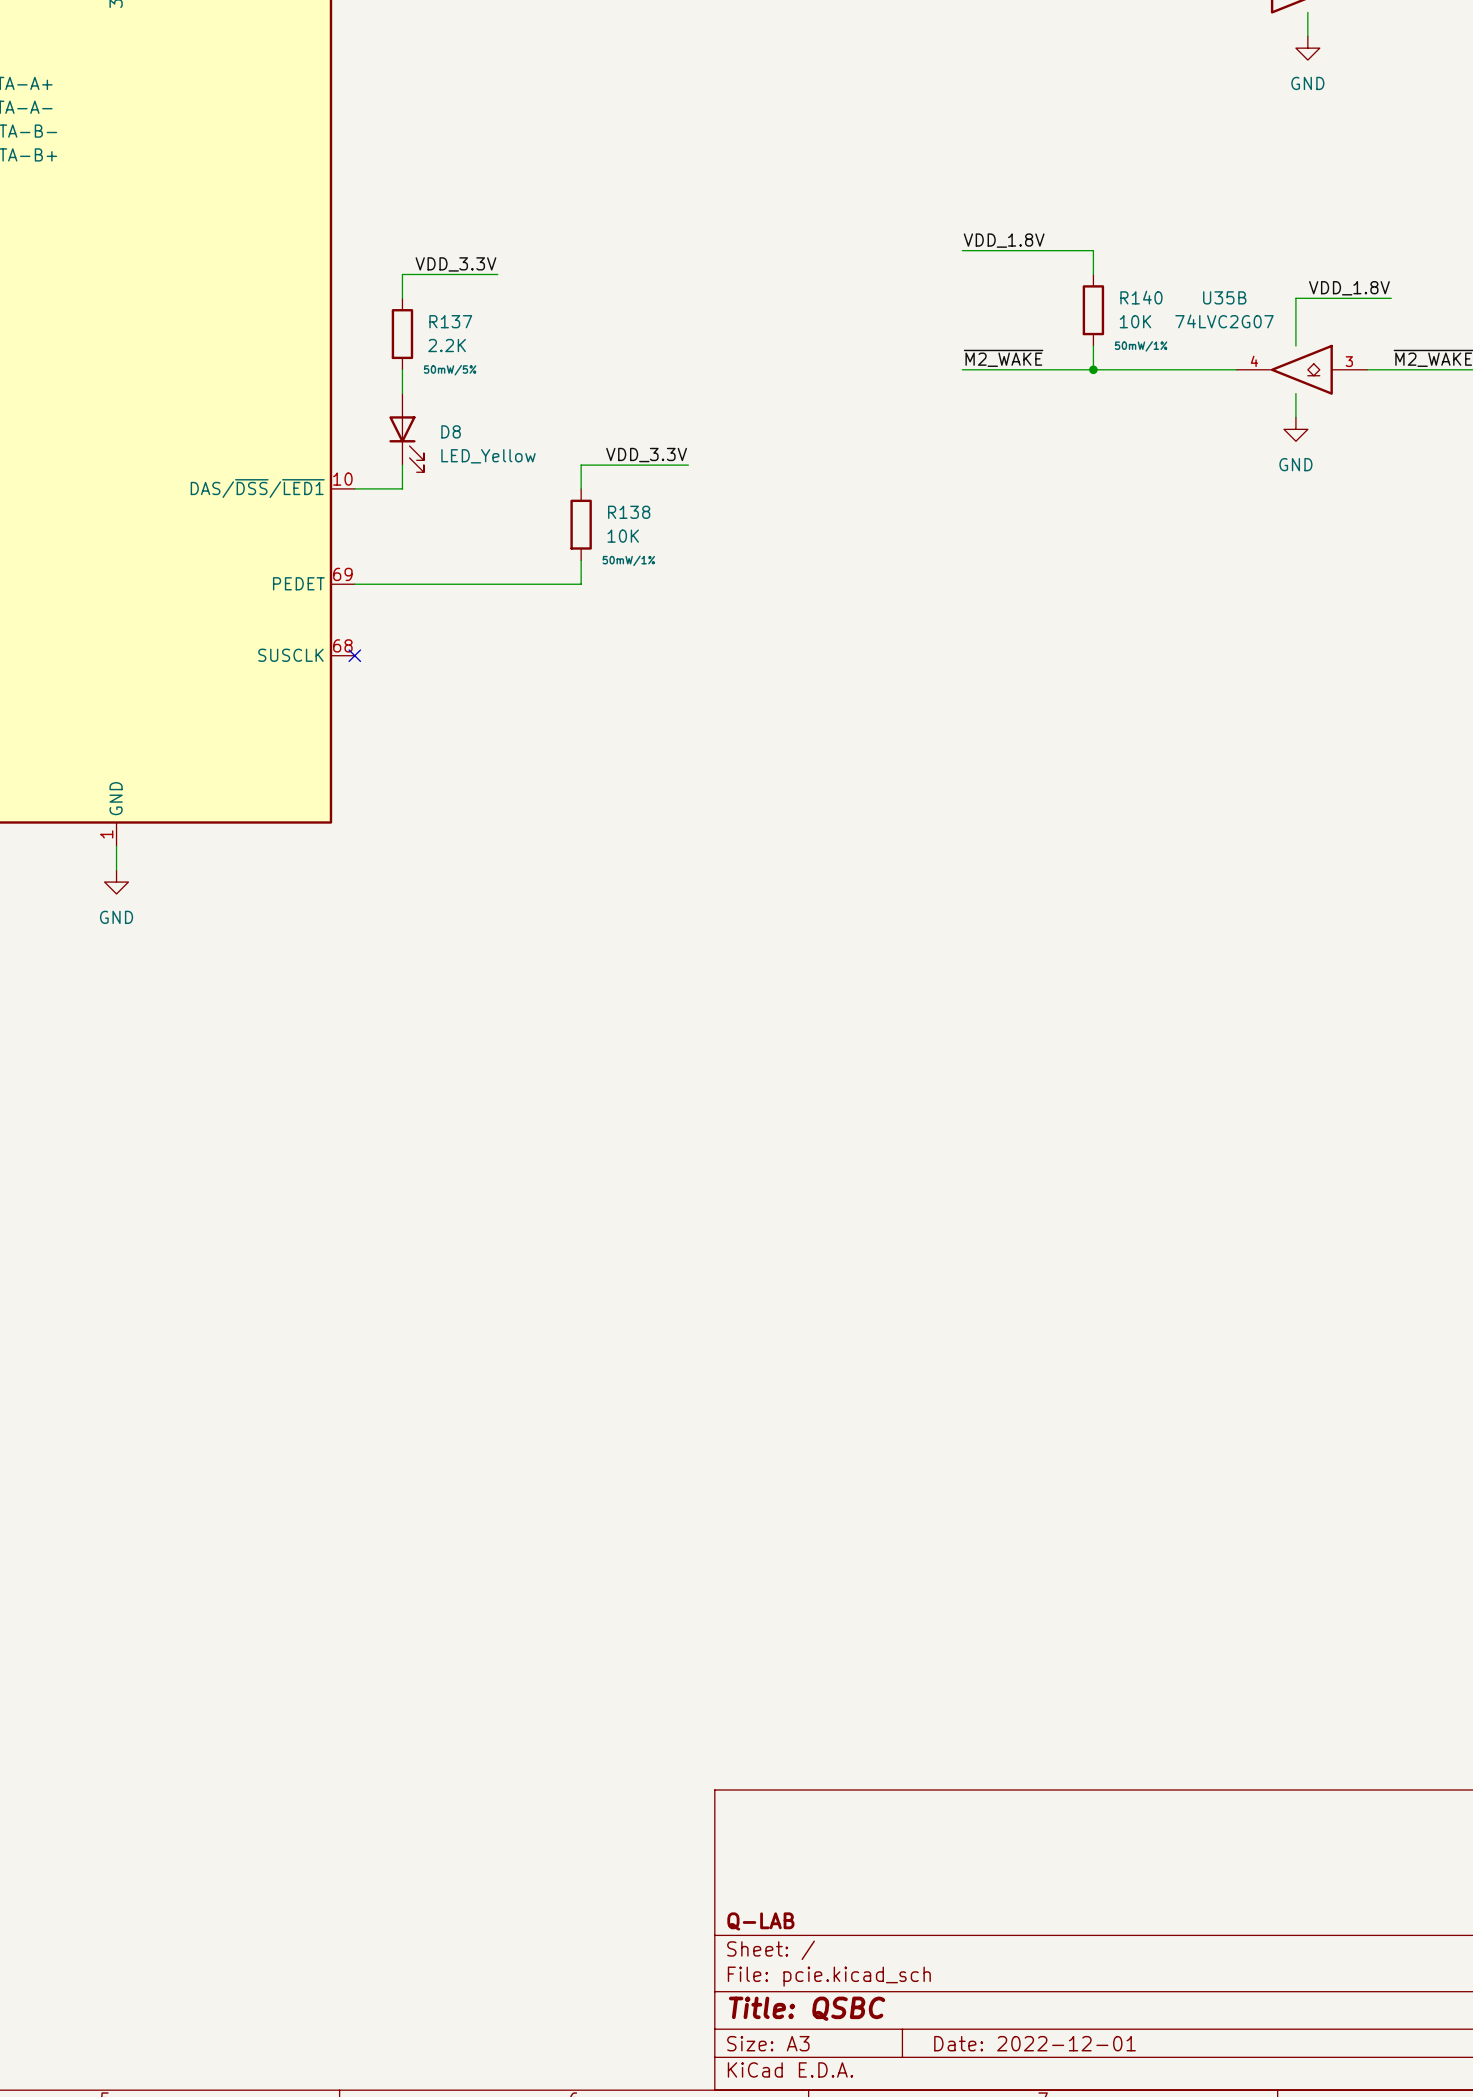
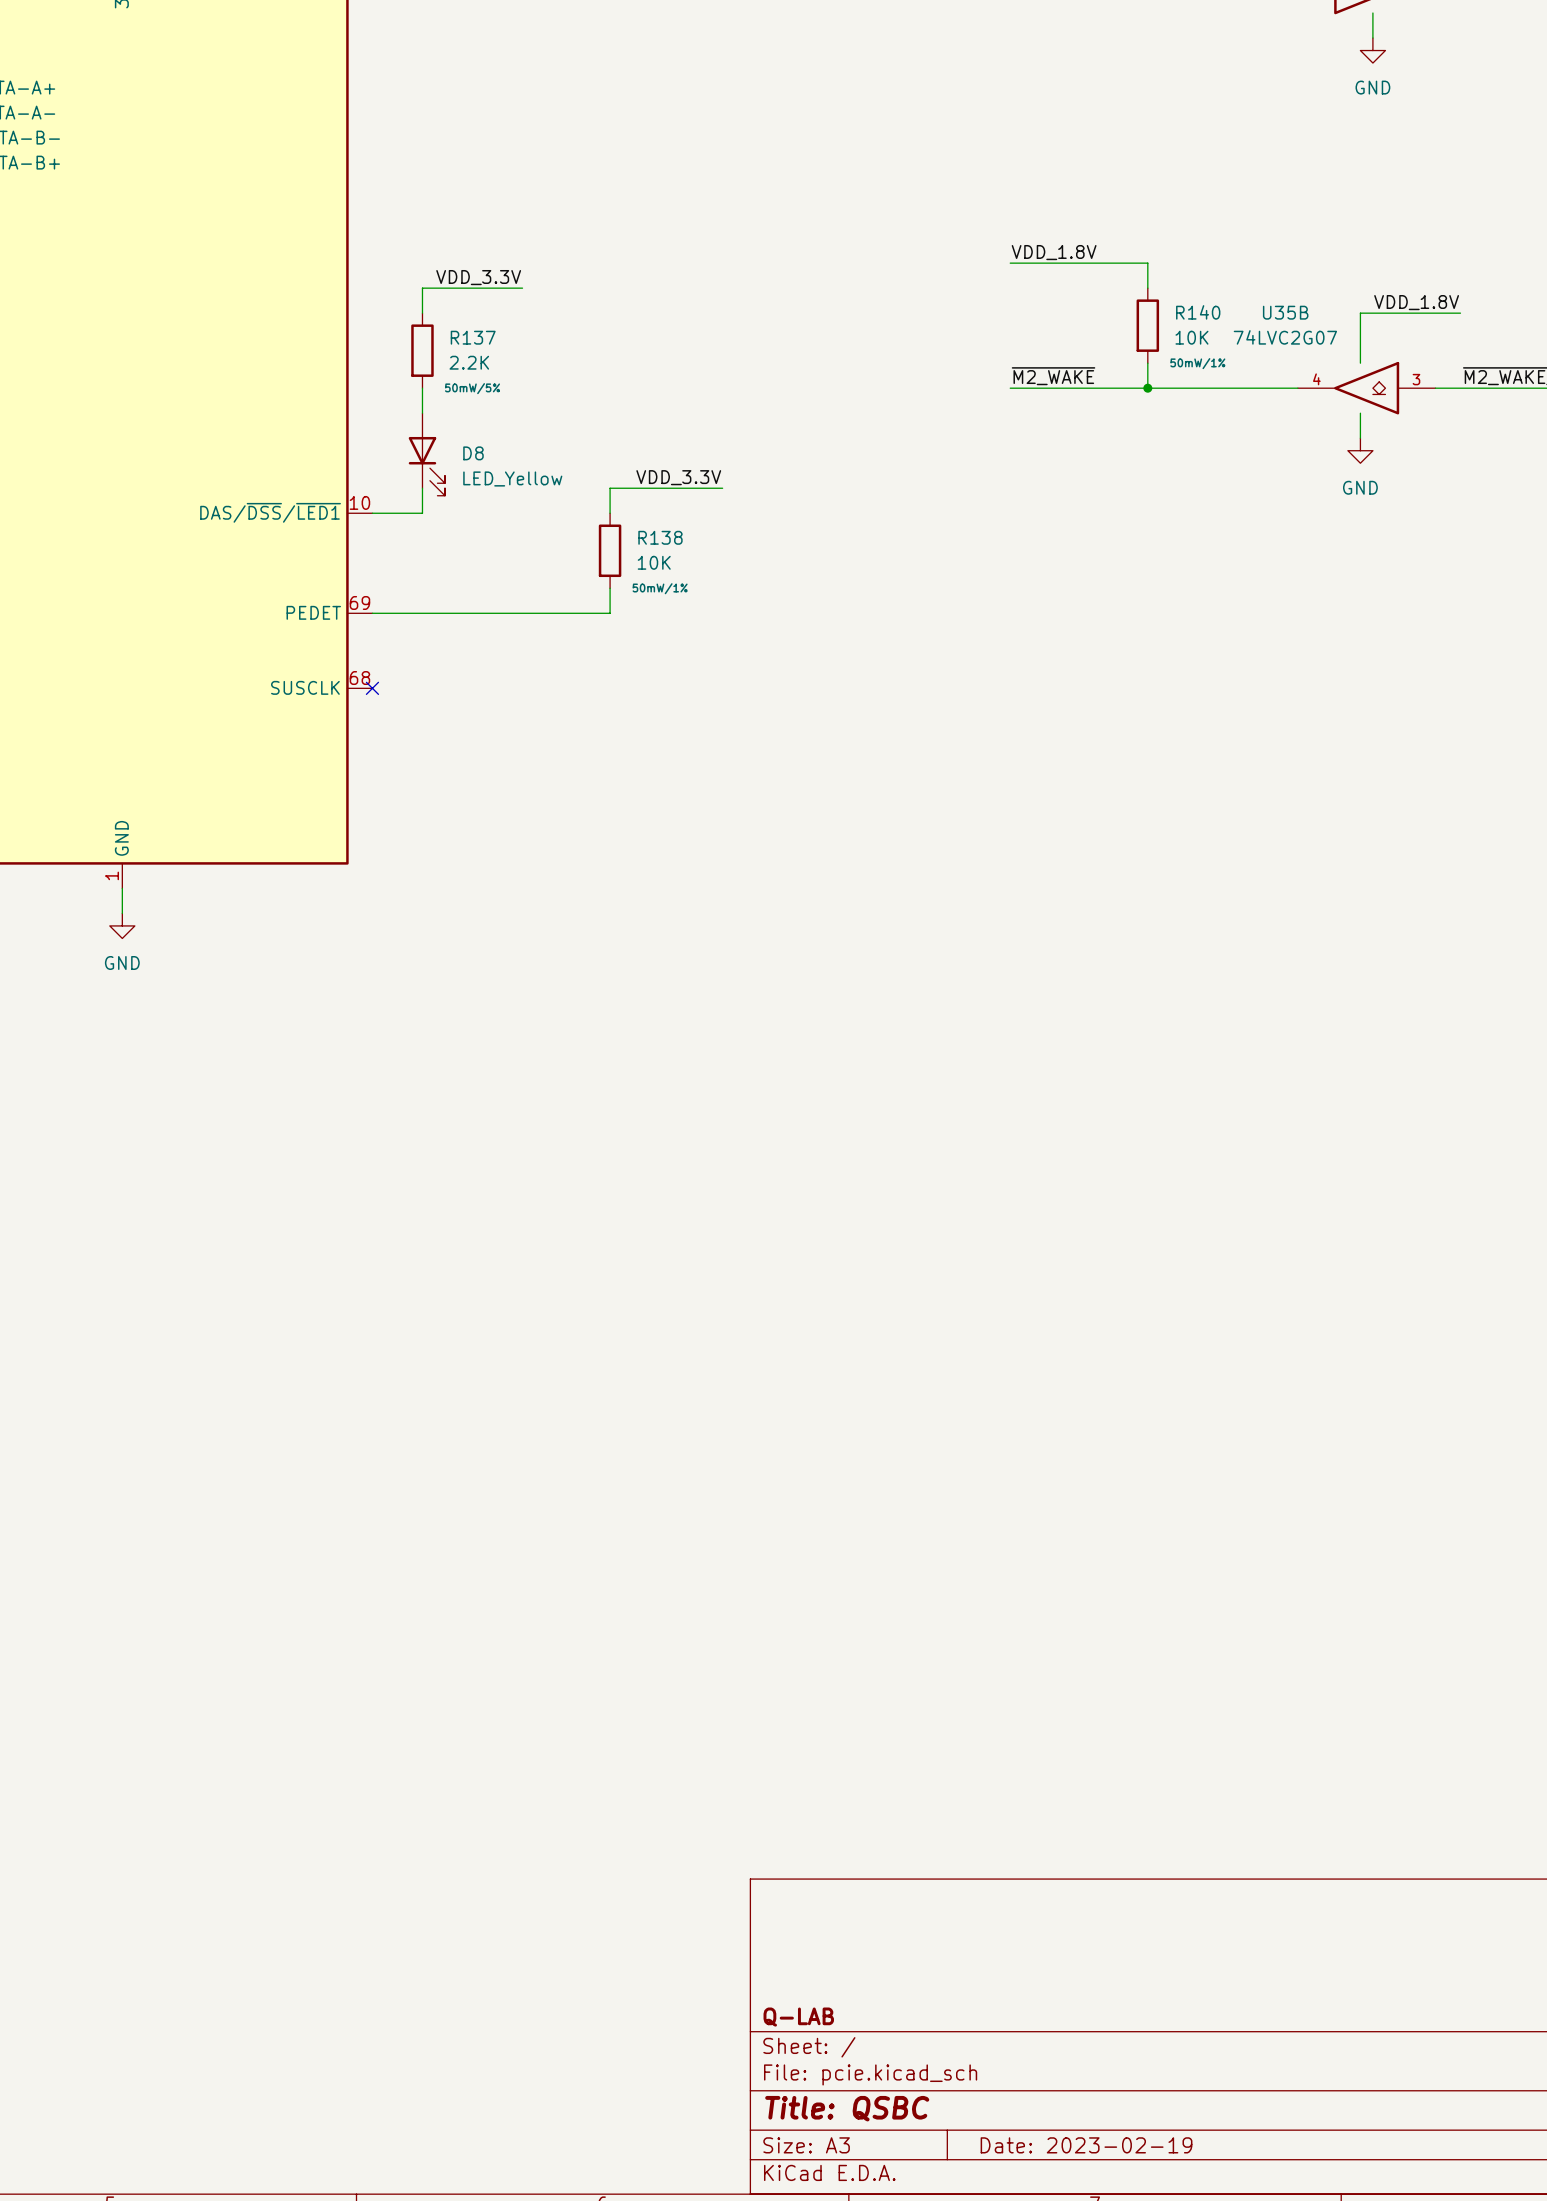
title block: Date: 2022-12-01 (1035, 2043) -> Date: 2023-02-19 (1086, 2145)

